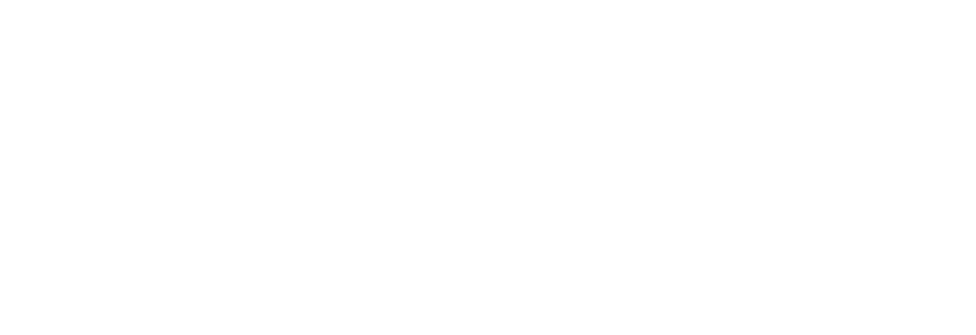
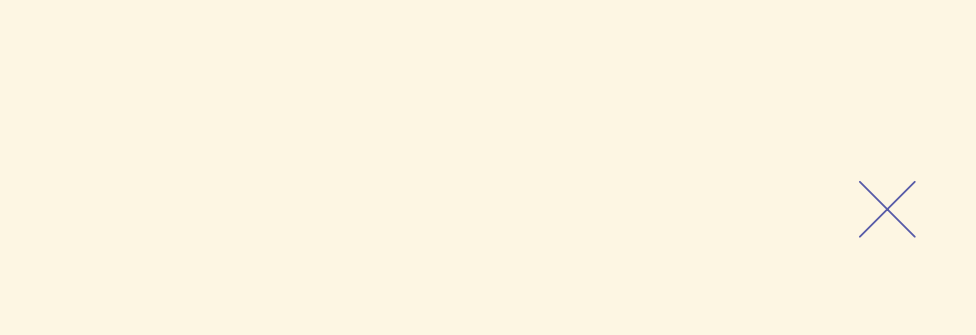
no-connect mark: none -> (887, 209)

